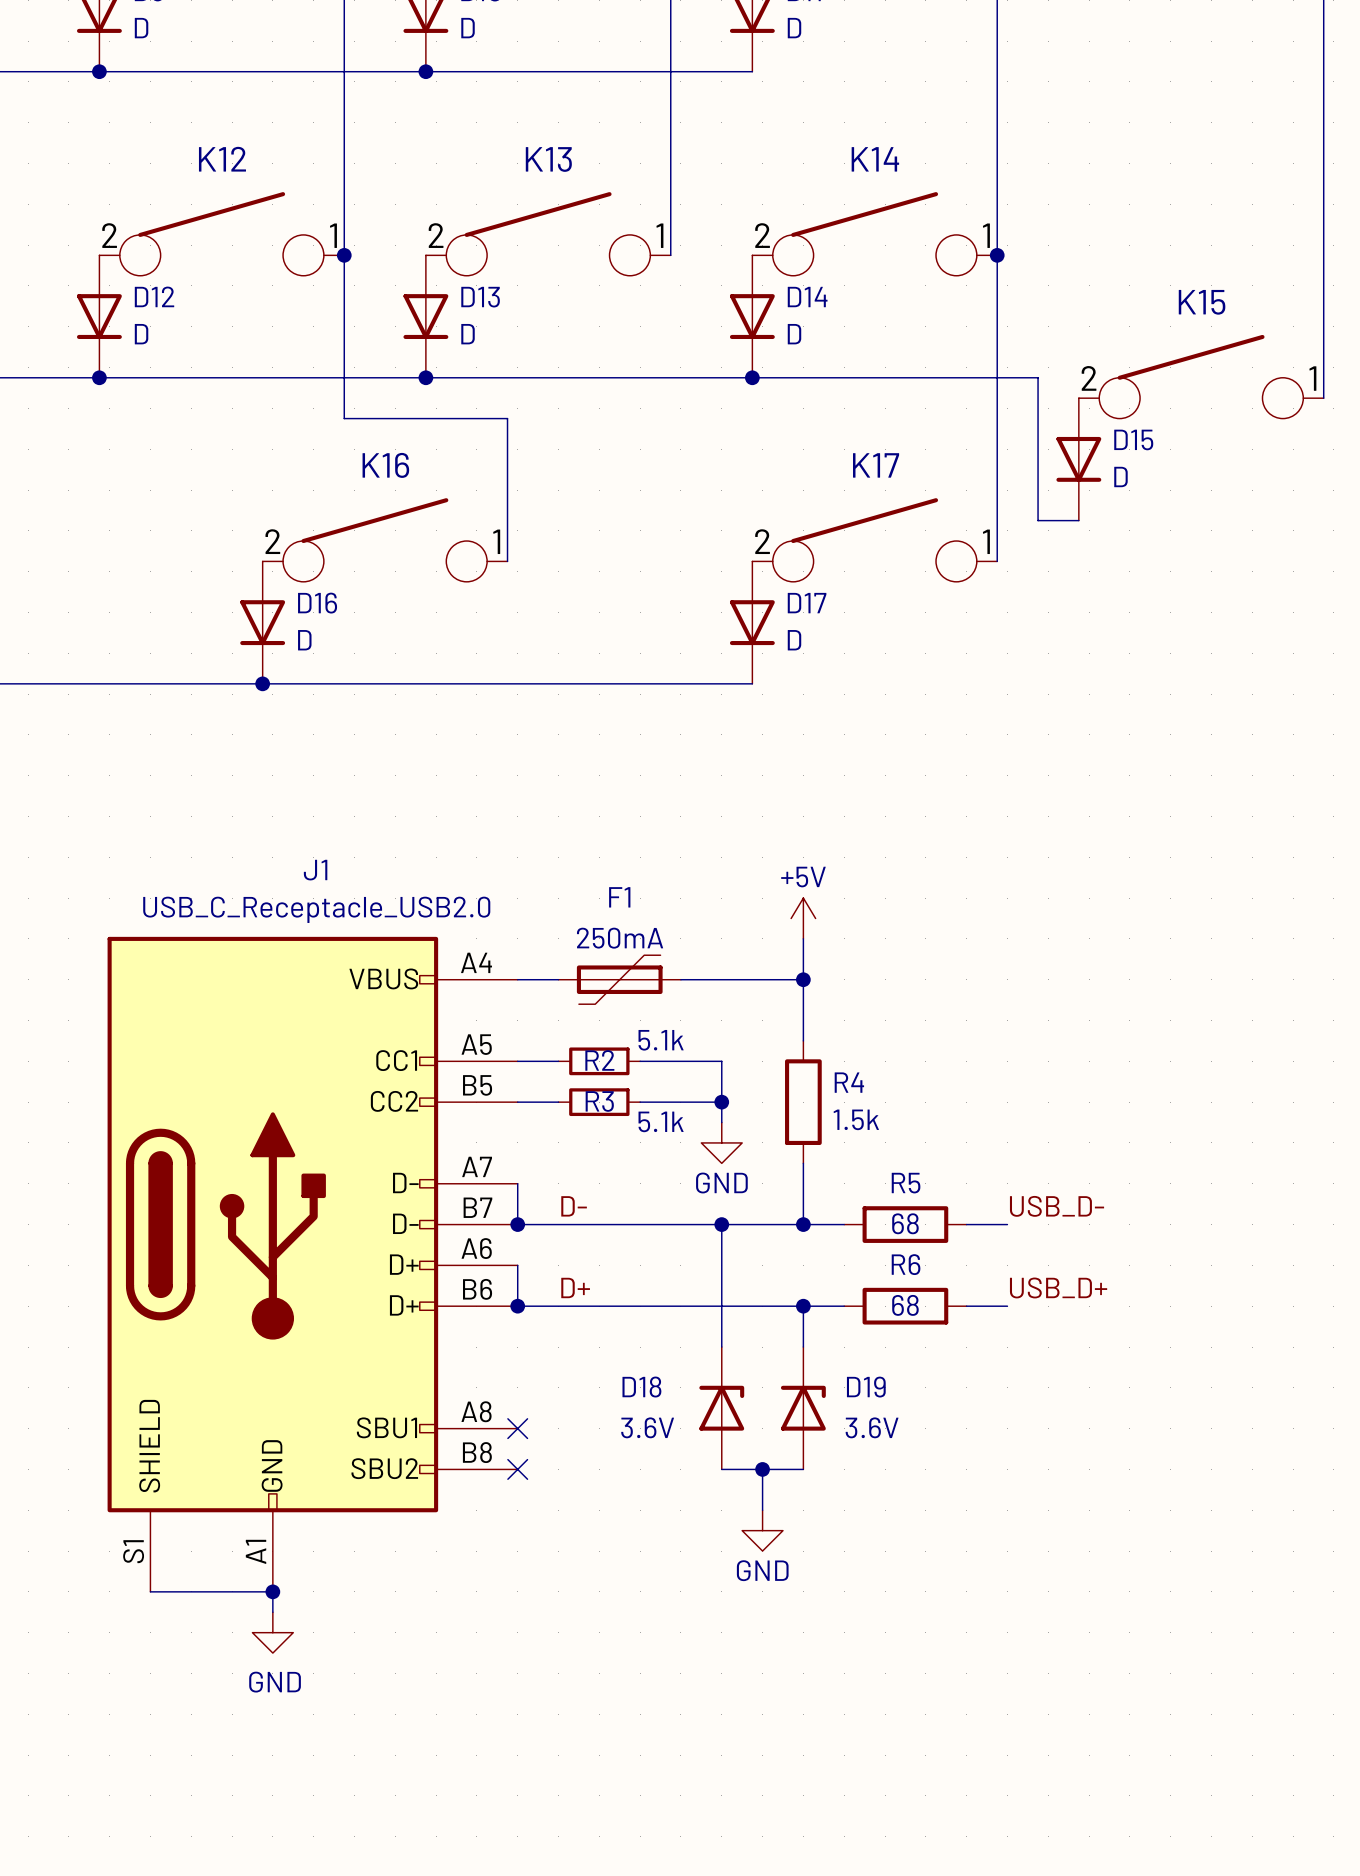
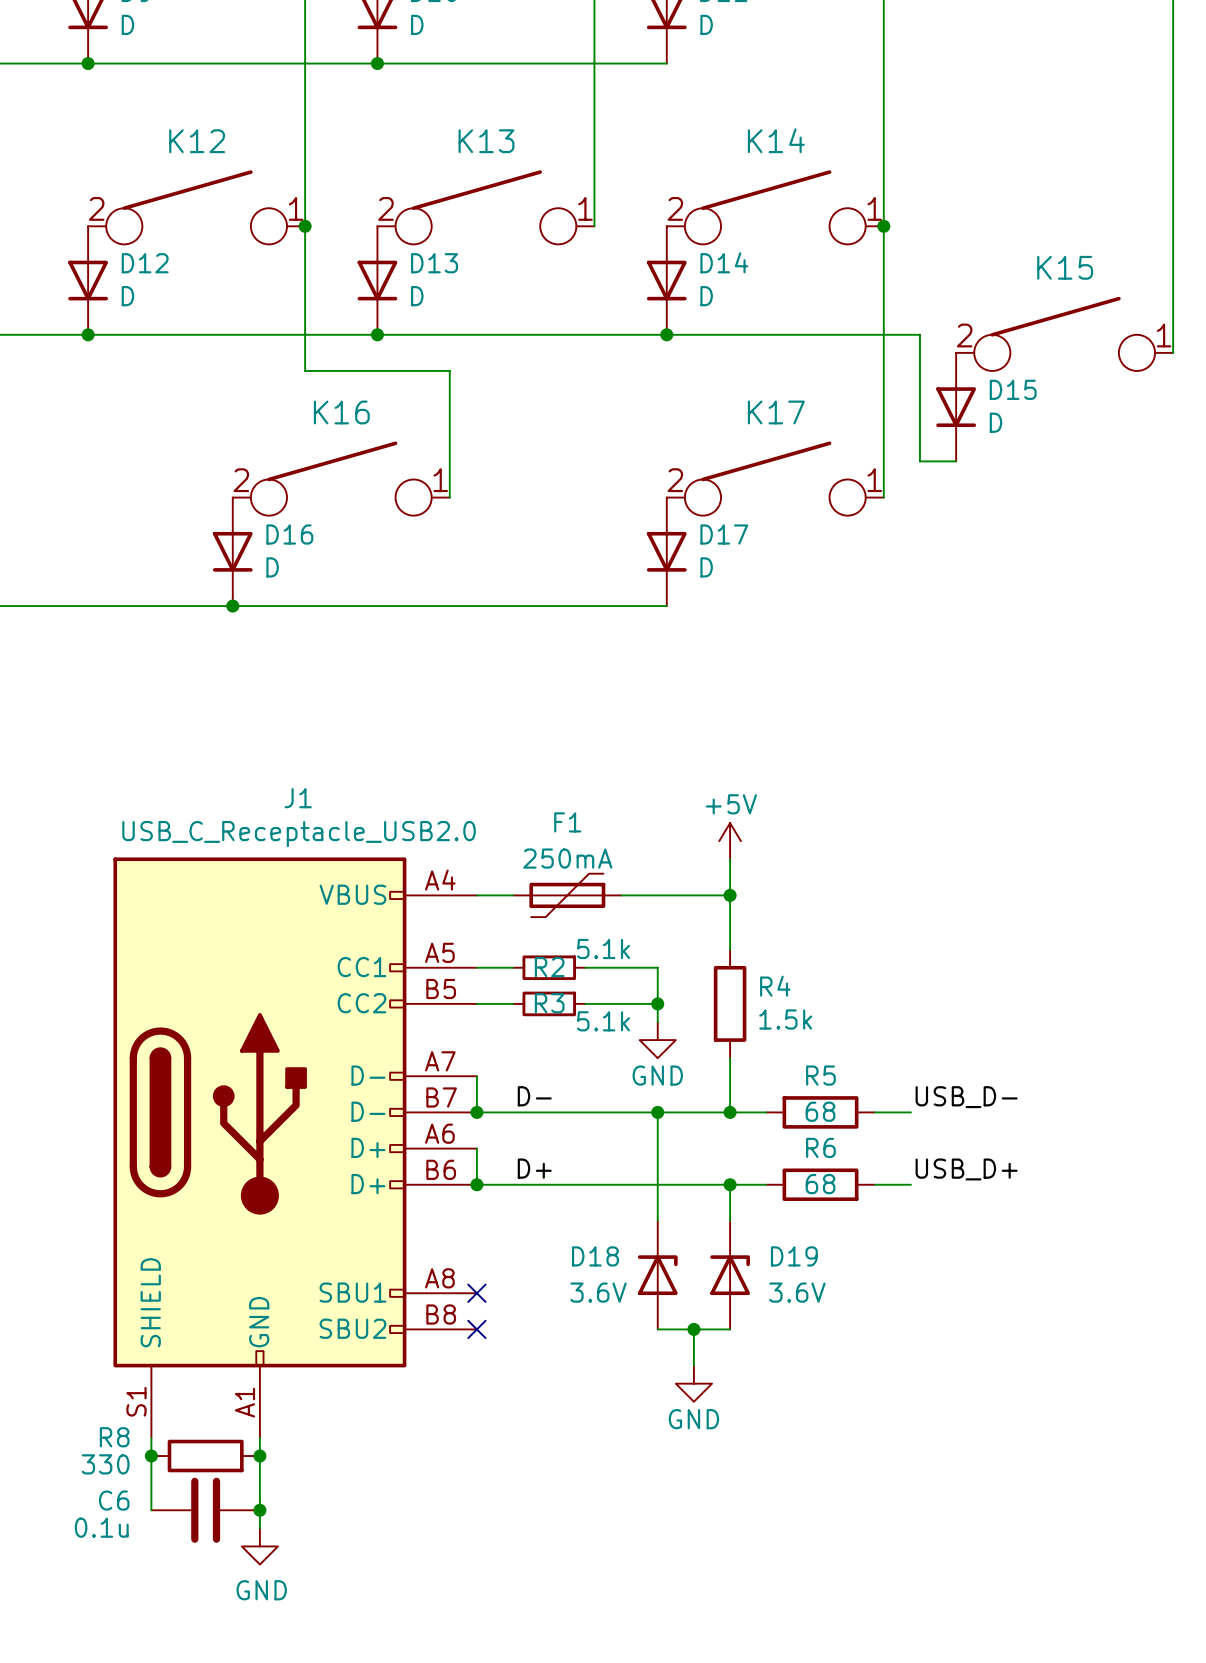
power symbol position: +5V (803, 918) -> +5V (730, 841)
wire: (803, 938) (803, 1040) -> (730, 859) (730, 949)
wire: (517, 979) (558, 979) -> (476, 895) (513, 895)
F1 position: (619, 979) -> (567, 895)
wire: (680, 979) (803, 979) -> (621, 895) (730, 895)
junction position: (803, 979) -> (730, 895)
wire: (517, 1061) (558, 1061) -> (476, 967) (513, 967)
R2 position: (599, 1061) -> (549, 967)
wire: (640, 1061) (721, 1061) (721, 1122) -> (585, 967) (657, 967) (657, 1022)
wire: (517, 1102) (558, 1102) -> (476, 1003) (513, 1003)
R3 position: (599, 1102) -> (549, 1003)
wire: (640, 1102) (721, 1102) -> (585, 1003) (657, 1003)
junction position: (721, 1102) -> (657, 1003)
R4 position: (803, 1102) -> (730, 1003)
power symbol position: GND (721, 1142) -> GND (657, 1040)
wire: (803, 1163) (803, 1224) -> (730, 1058) (730, 1112)
wire: (517, 1183) (517, 1224) (844, 1224) -> (476, 1076) (476, 1112) (766, 1112)
label position: D- (574, 1206) -> D- (534, 1096)
label position: USB_D- (1057, 1206) -> USB_D- (966, 1097)
junction: (517, 1224) -> none
wire: (721, 1224) (721, 1347) -> (657, 1112) (657, 1220)
junction: (721, 1224) -> none
junction: (803, 1224) -> none
R5 position: (905, 1224) -> (820, 1112)
wire: (966, 1224) (1007, 1224) -> (874, 1112) (910, 1112)
junction: none -> (476, 1112)
junction: none -> (657, 1112)
junction: none -> (730, 1112)
J1 position: (312, 1264) -> (295, 1147)
wire: (517, 1265) (517, 1306) (844, 1306) -> (476, 1148) (476, 1184) (766, 1184)
label position: D+ (575, 1287) -> D+ (534, 1168)
label position: USB_D+ (1058, 1287) -> USB_D+ (966, 1169)
junction: (517, 1306) -> none
wire: (803, 1306) (803, 1347) -> (730, 1184) (730, 1220)
junction: (803, 1306) -> none
R6 position: (905, 1306) -> (820, 1184)
wire: (966, 1306) (1007, 1306) -> (874, 1184) (910, 1184)
junction: none -> (476, 1184)
junction: none -> (730, 1184)
D18 position: (721, 1408) -> (657, 1275)
D19 position: (803, 1408) -> (730, 1275)
no-connect mark: (517, 1428) -> none
no-connect mark: none -> (476, 1293)
no-connect mark: (517, 1469) -> none
wire: (721, 1469) (803, 1469) -> (657, 1329) (730, 1329)
wire: (762, 1469) (762, 1510) -> (693, 1329) (693, 1365)
junction position: (762, 1469) -> (693, 1329)
no-connect mark: none -> (476, 1329)
power symbol position: GND (762, 1530) -> GND (693, 1383)
wire: (150, 1591) (272, 1591) (272, 1612) -> none
junction position: (272, 1591) -> (259, 1456)
wire: none -> (151, 1437) (151, 1510)
wire: none -> (259, 1437) (259, 1528)
power symbol position: GND (272, 1632) -> GND (259, 1546)
junction: none -> (151, 1456)
R8: none -> 330 (205, 1456)
C6: none -> 0.1u (205, 1510)
junction: none -> (259, 1510)

